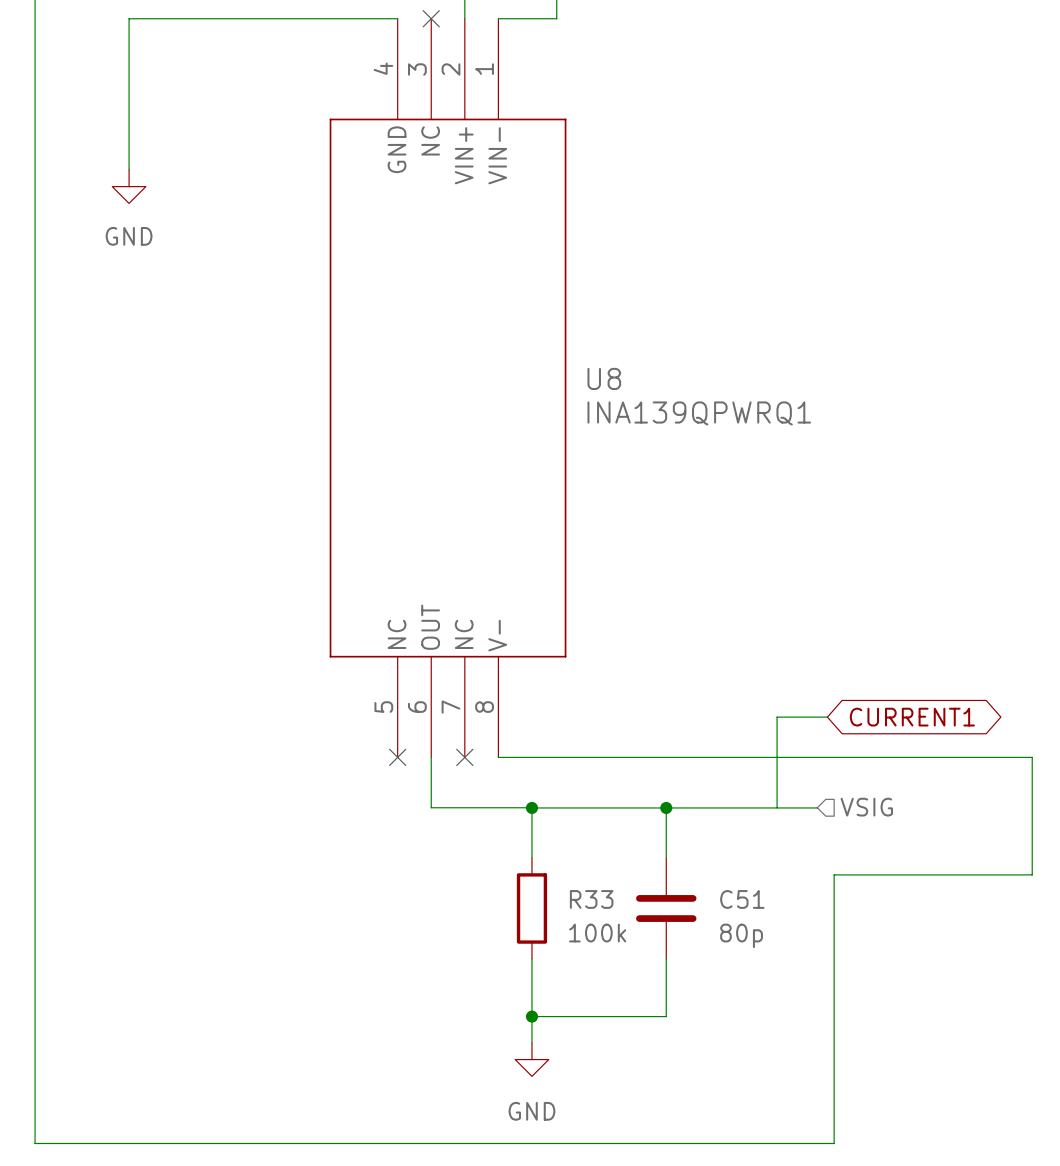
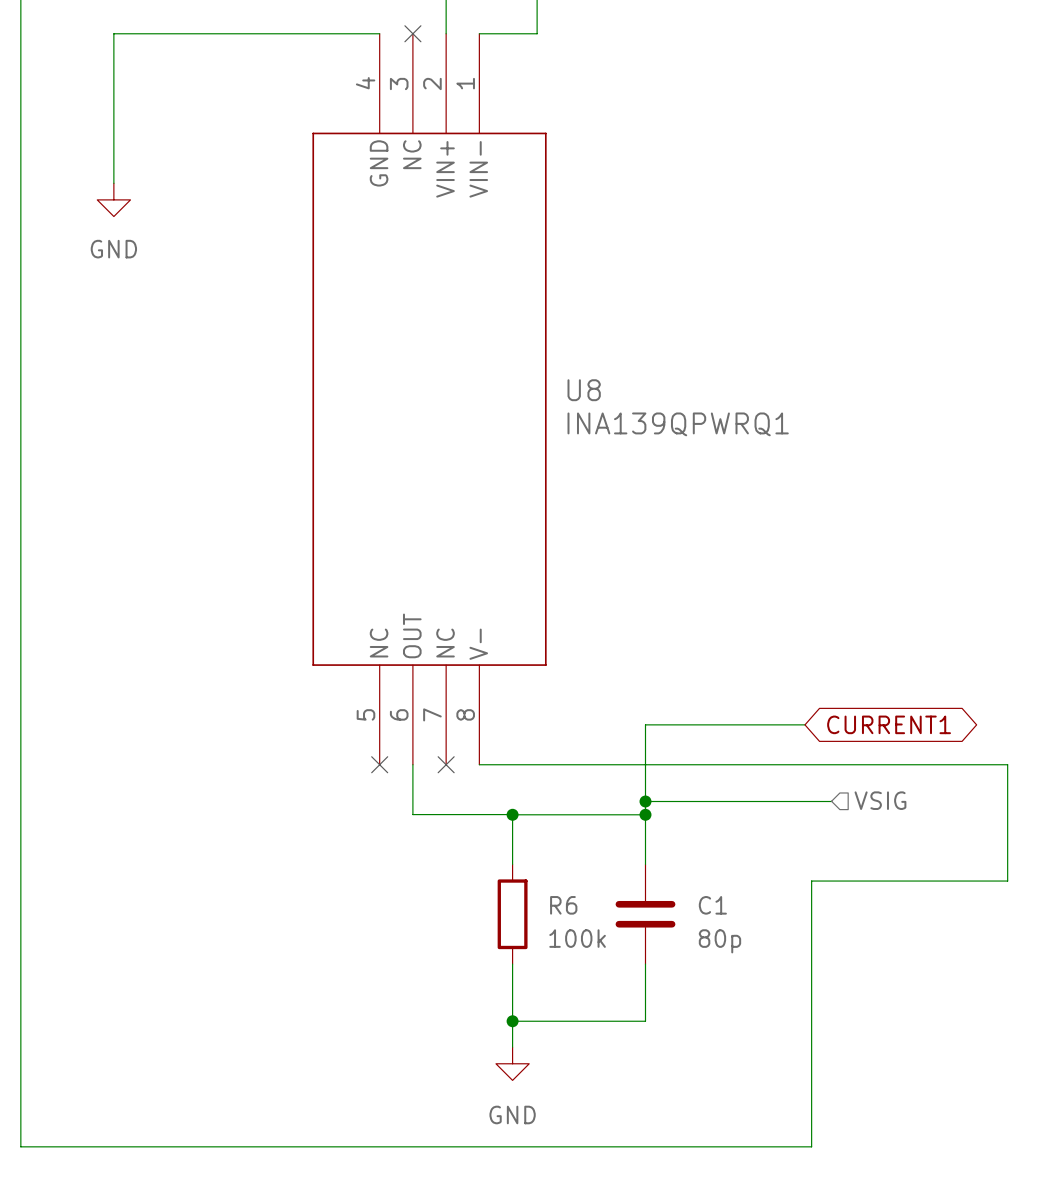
wire: (777, 717) (777, 807) -> none
wire: none -> (645, 801) (831, 801)
junction: none -> (645, 801)
wire: (666, 807) (817, 807) -> (645, 814) (645, 724) (755, 724)
hierarchical label position: VSIG (866, 807) -> VSIG (880, 800)
R33 name: R33 (591, 899) -> R6 (563, 905)
C51 name: C51 (742, 899) -> C1 (712, 905)

